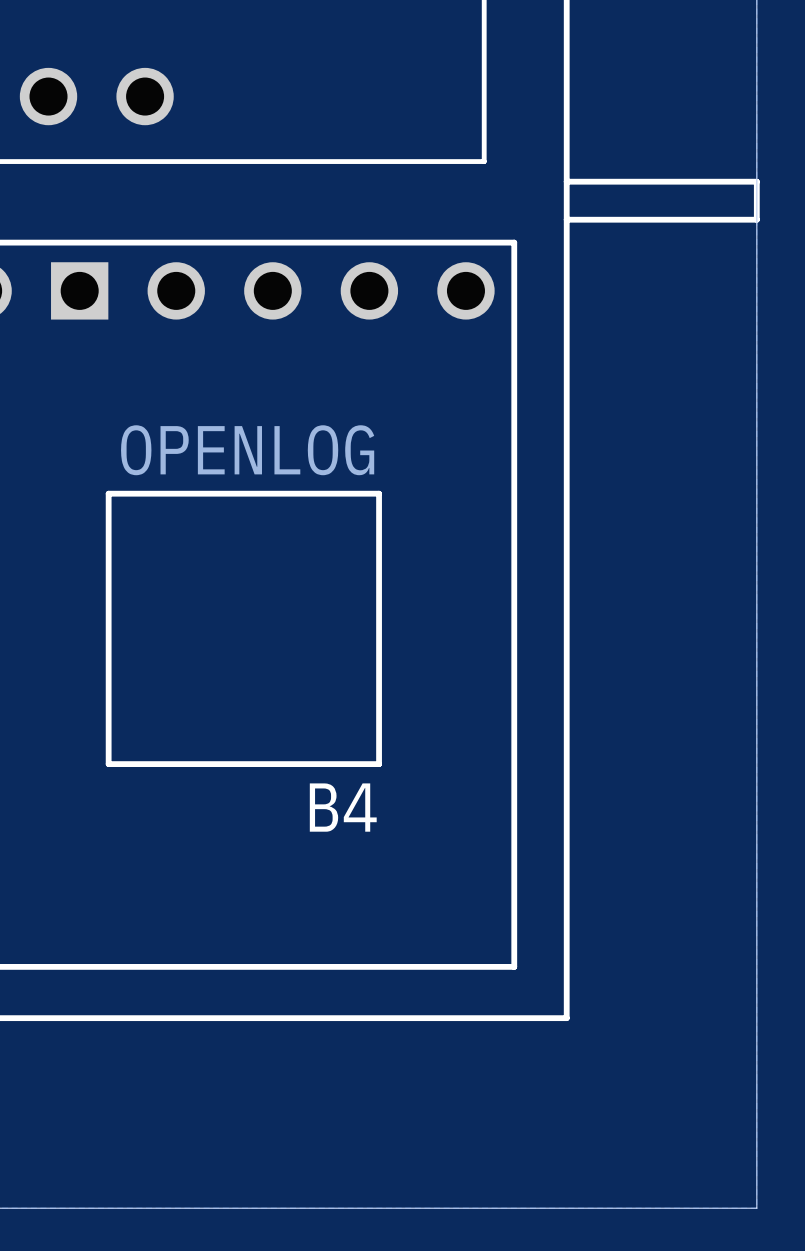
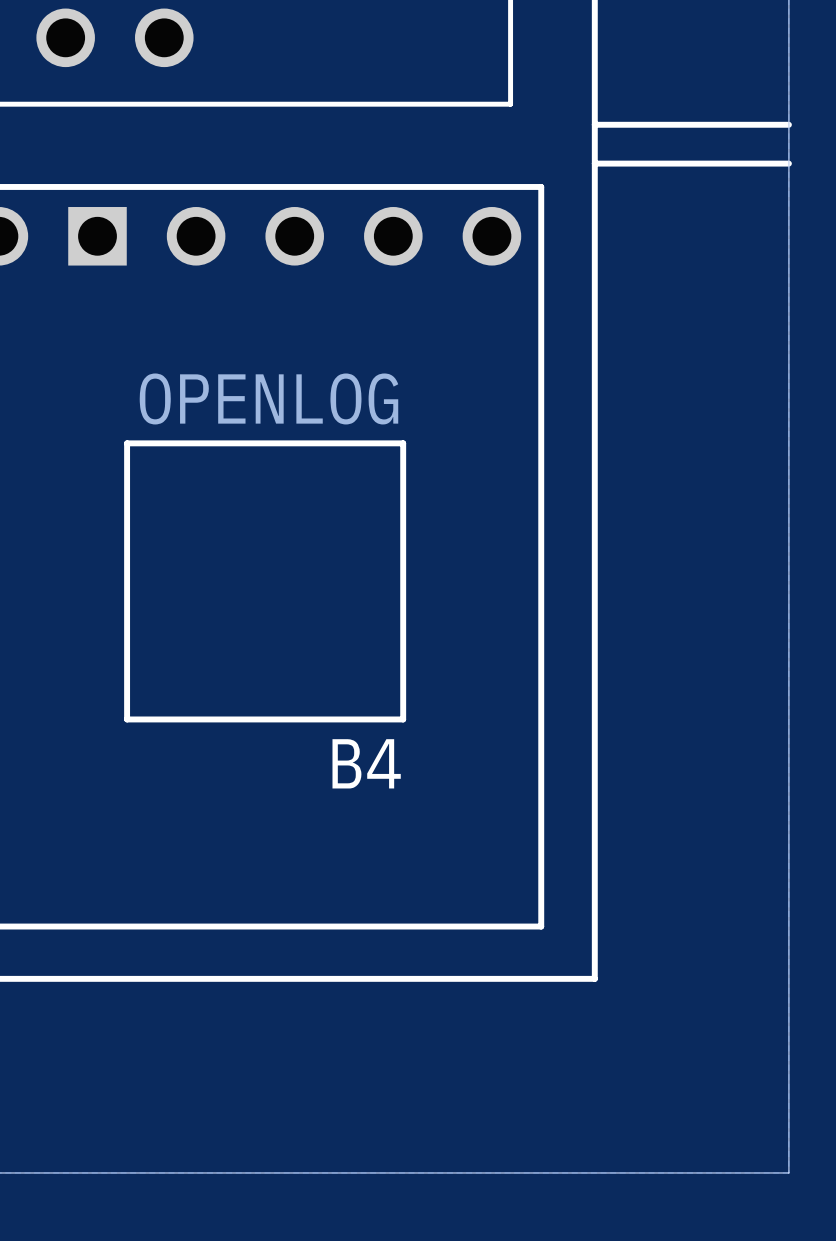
line: (756, 181) (756, 219) -> none

